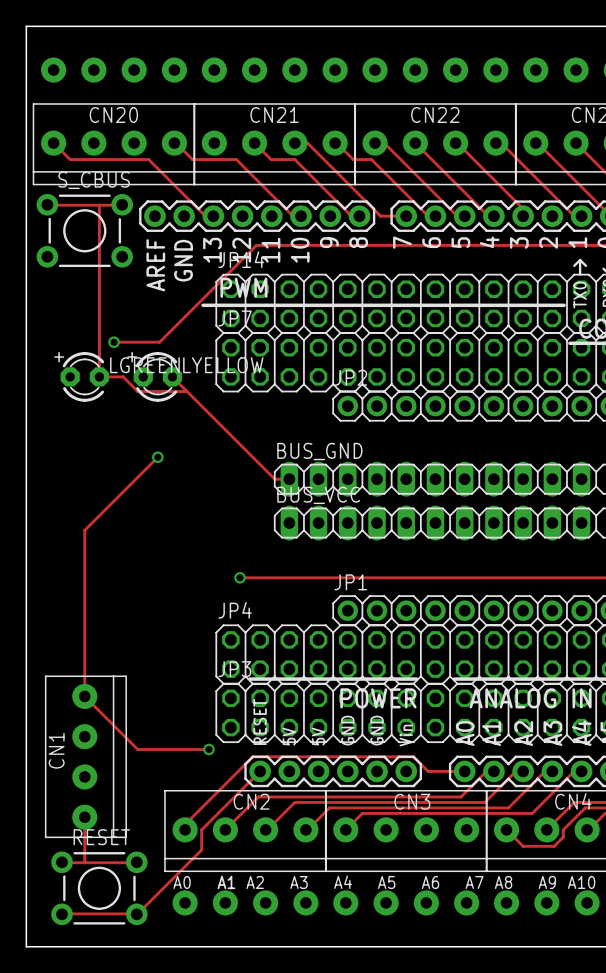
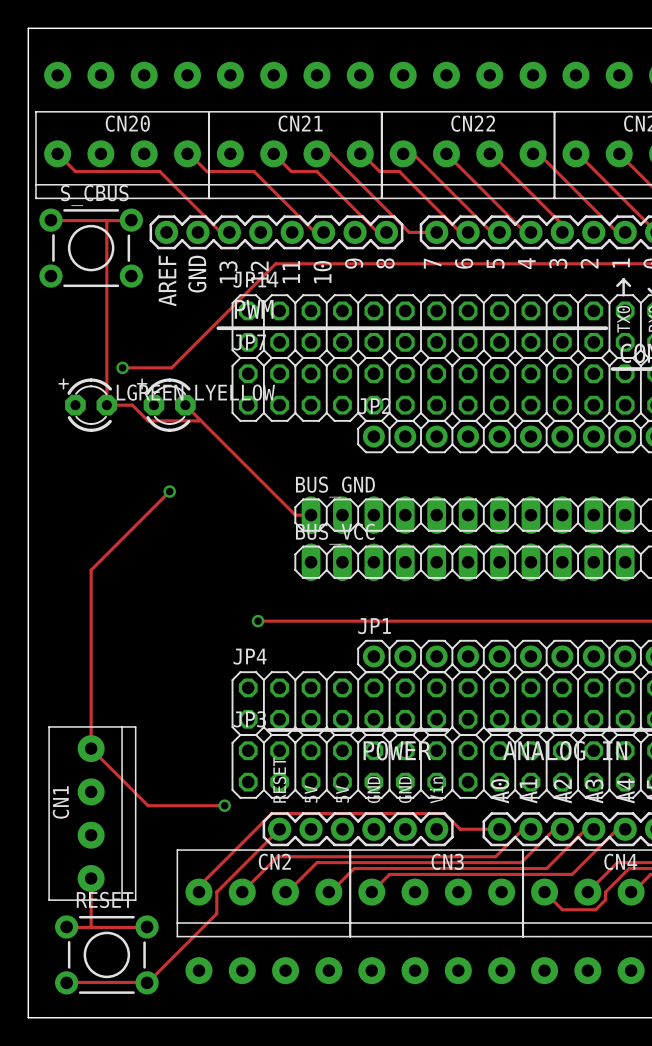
text: A0 (182, 882) -> none
text: A1 (226, 882) -> none
text: A2 (255, 882) -> none
text: A3 (298, 882) -> none
text: A4 (343, 882) -> none
text: A5 (386, 882) -> none
text: A6 (430, 882) -> none
text: A7 (474, 882) -> none
text: A8 (503, 882) -> none
text: A9 (547, 882) -> none
text: A10 (581, 882) -> none

